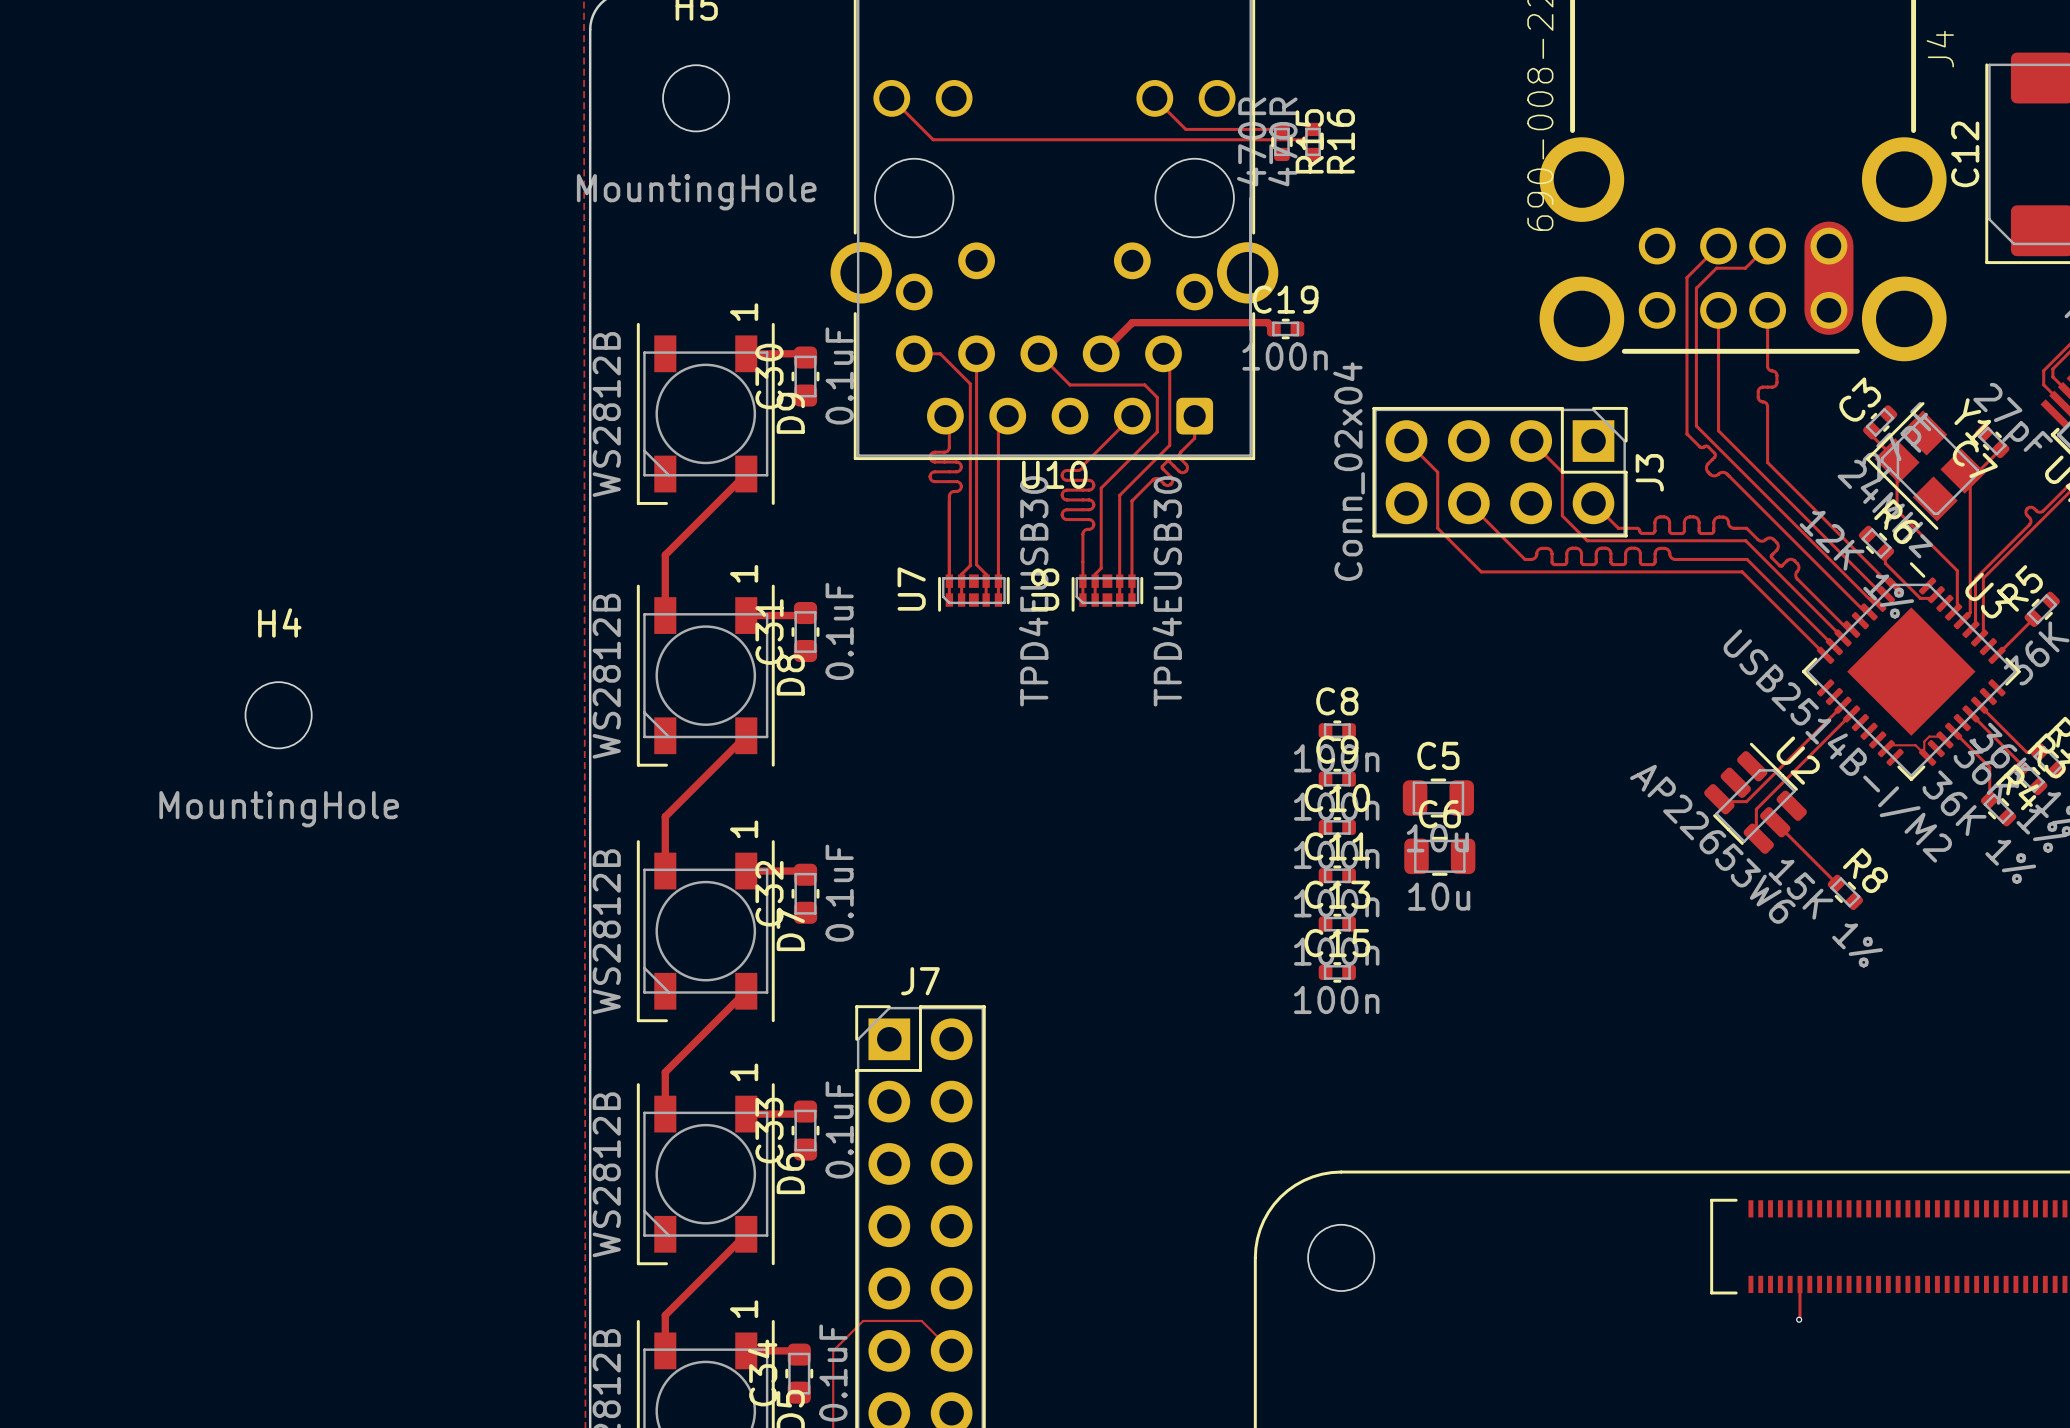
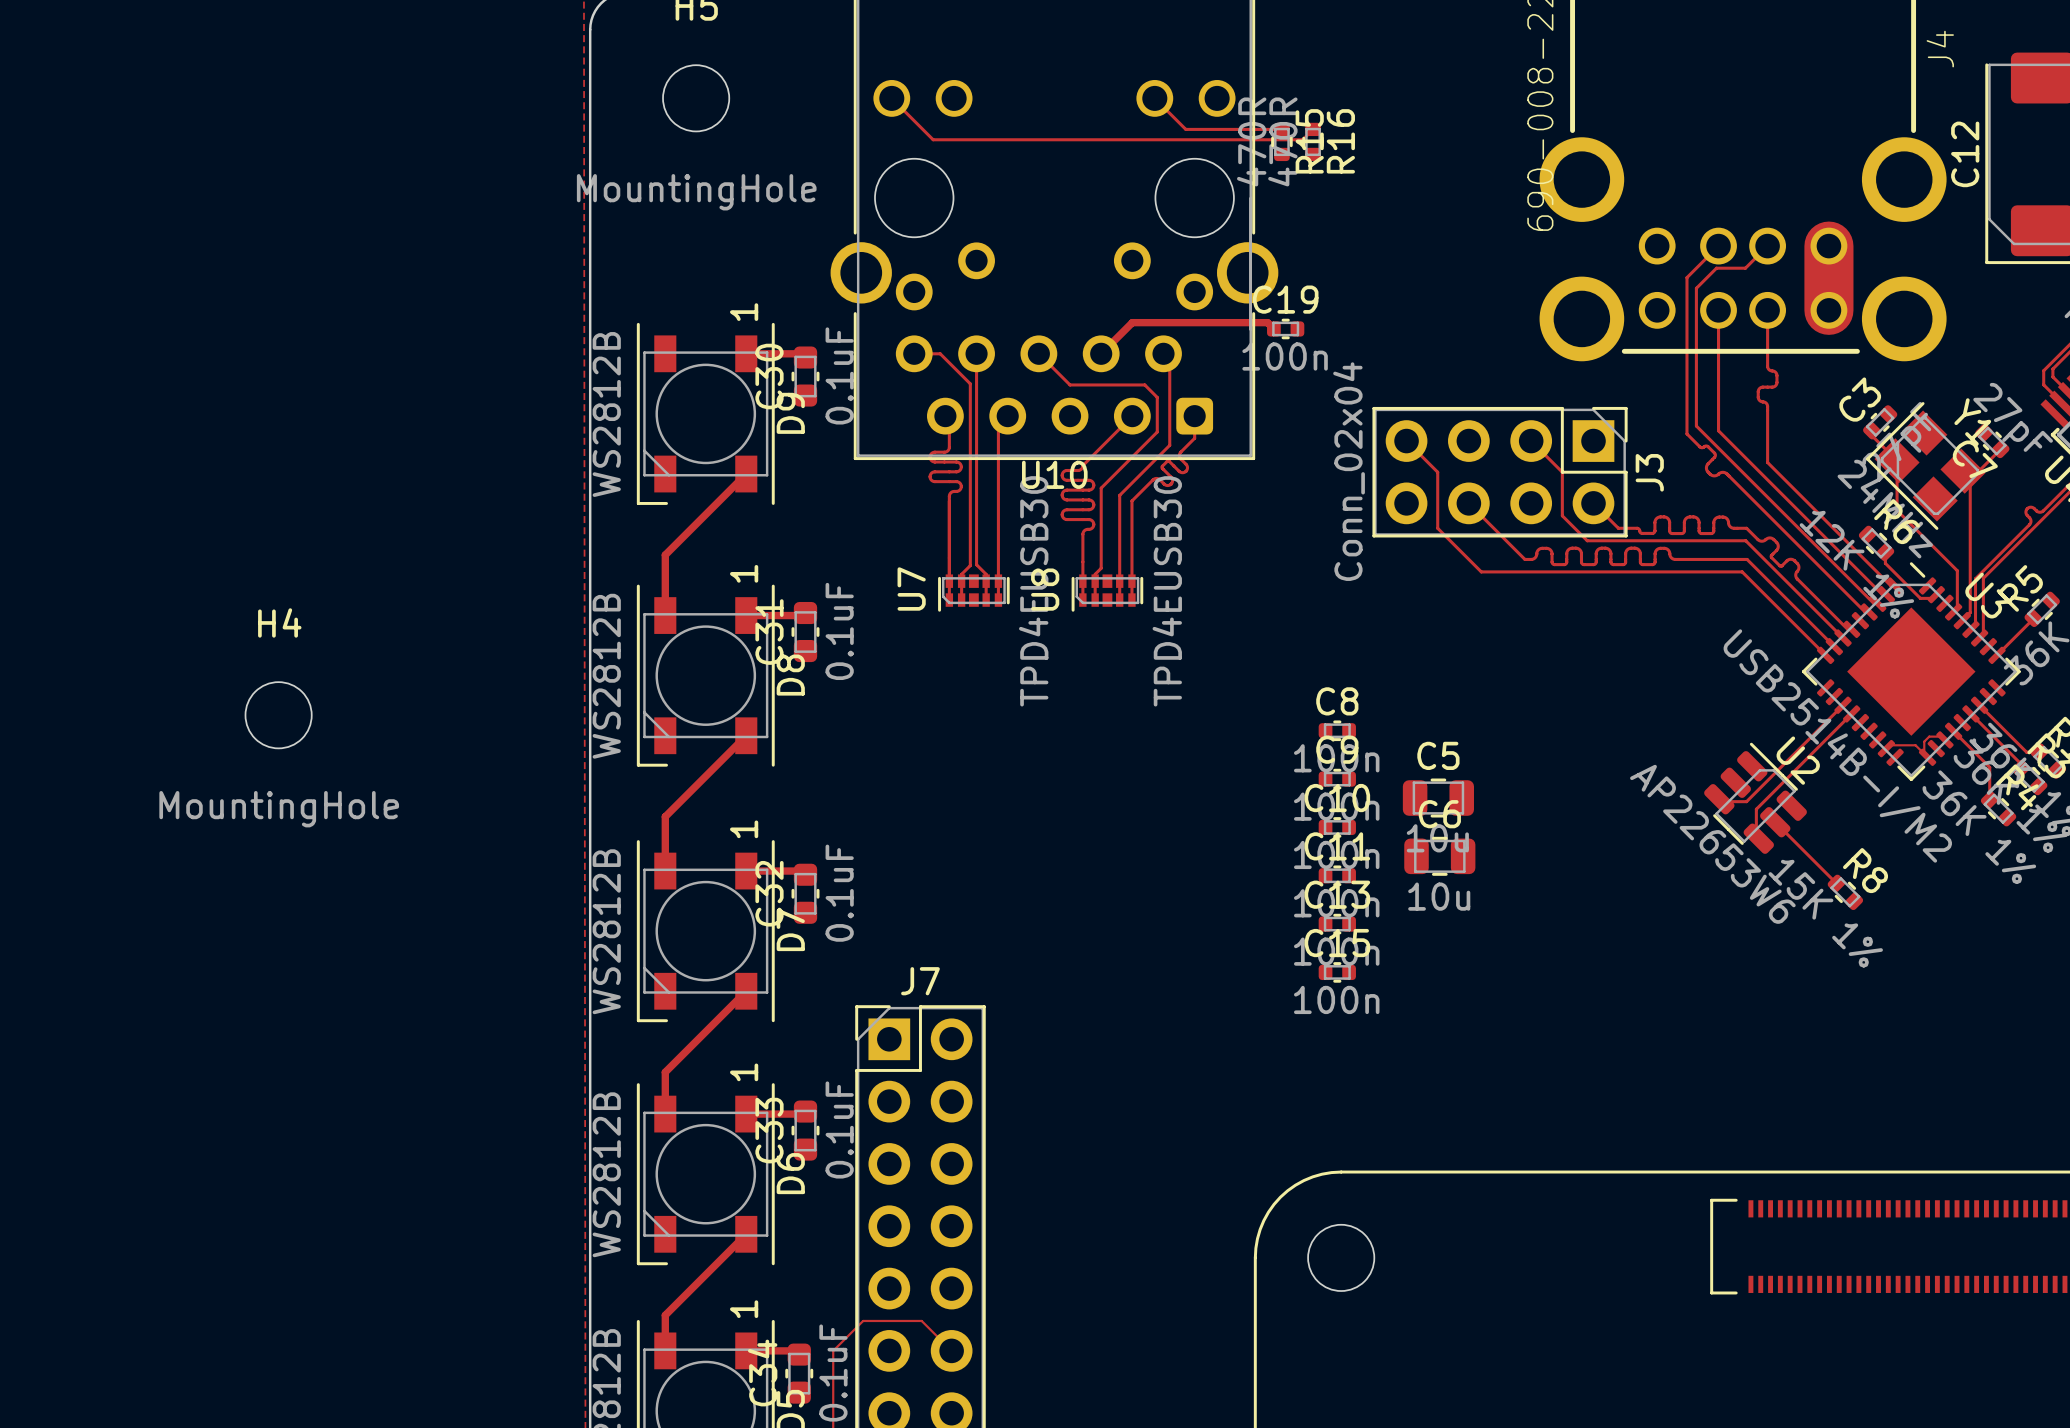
track: (1799, 1284) (1799, 1319) -> none
via: (1799, 1319) -> none

